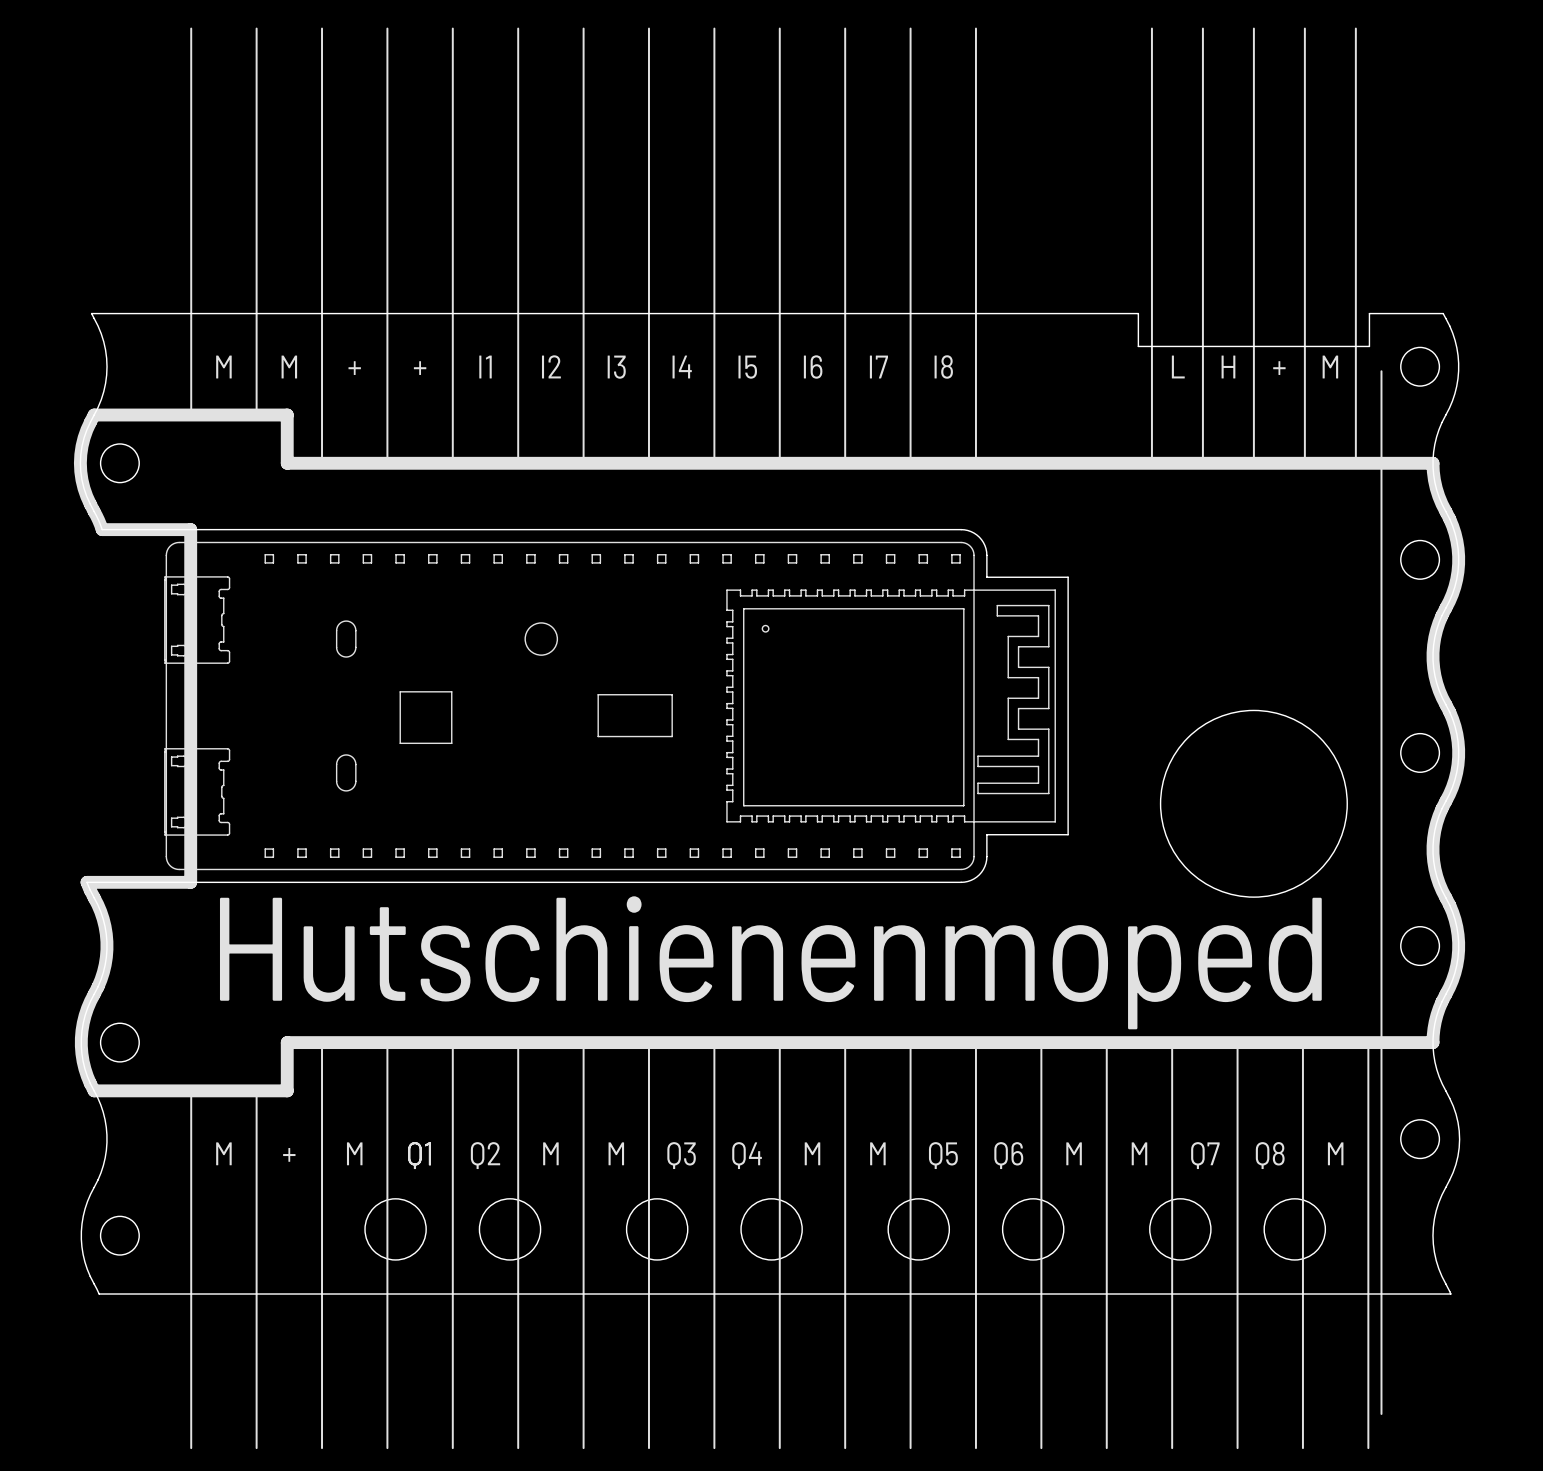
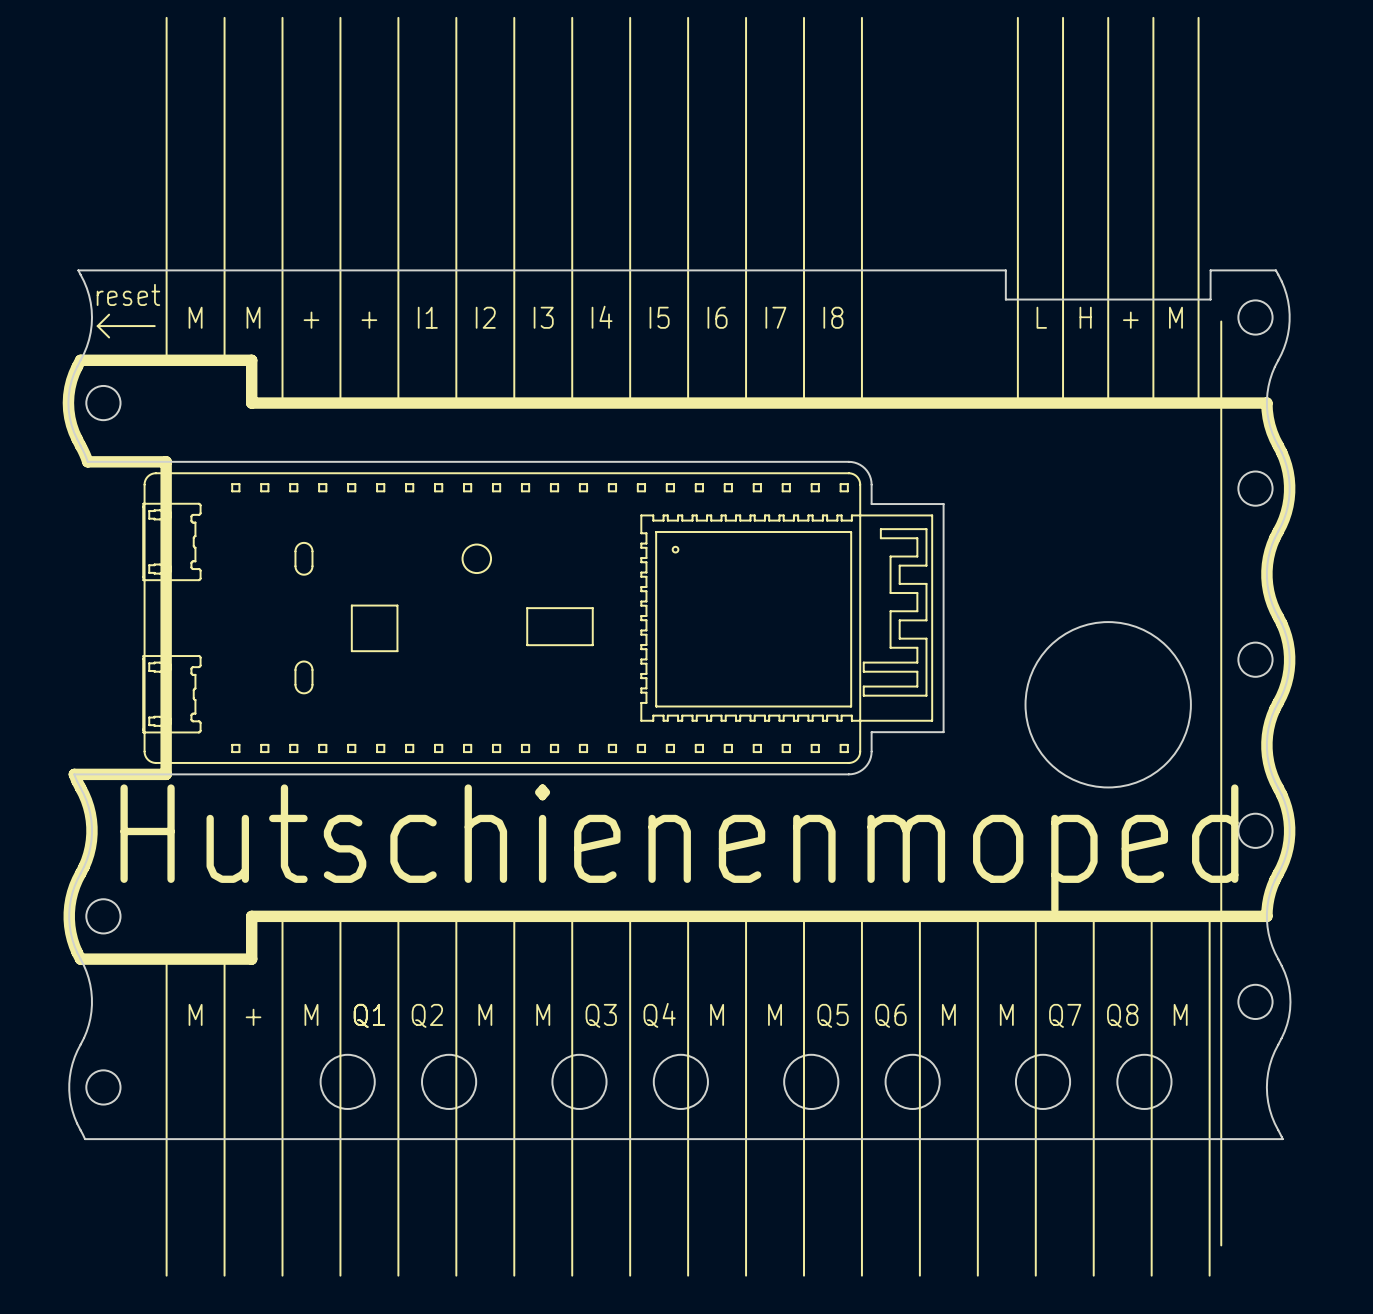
text: none -> reset (128, 294)
line: none -> (109, 314) (97, 326)
line: none -> (97, 326) (154, 326)
line: none -> (97, 326) (109, 337)

